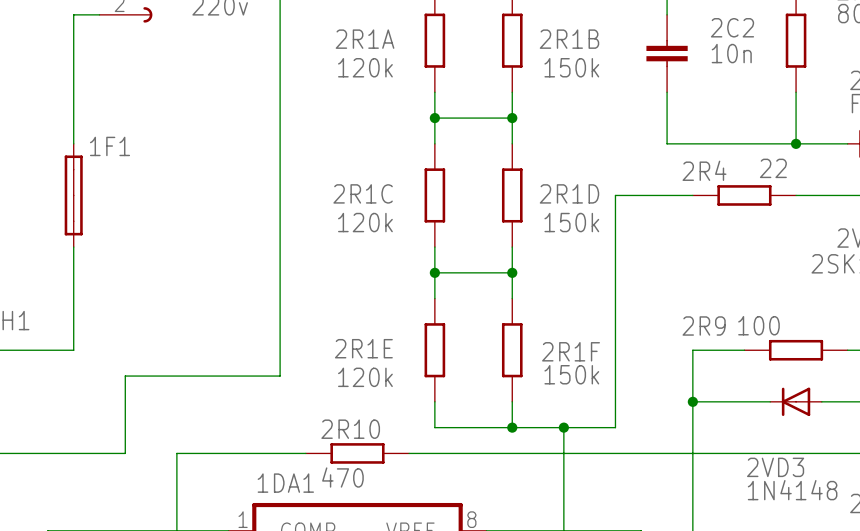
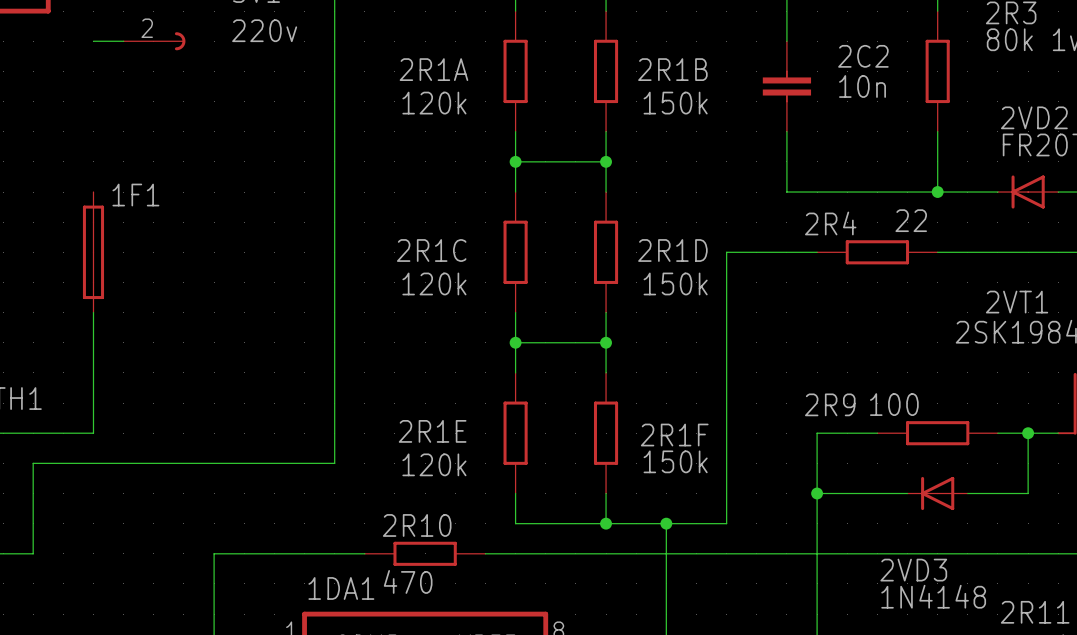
wire: (73, 14) (73, 143) -> none
wire: (125, 376) (125, 453) (22, 453) -> (153, 463) (33, 463) (33, 553)

